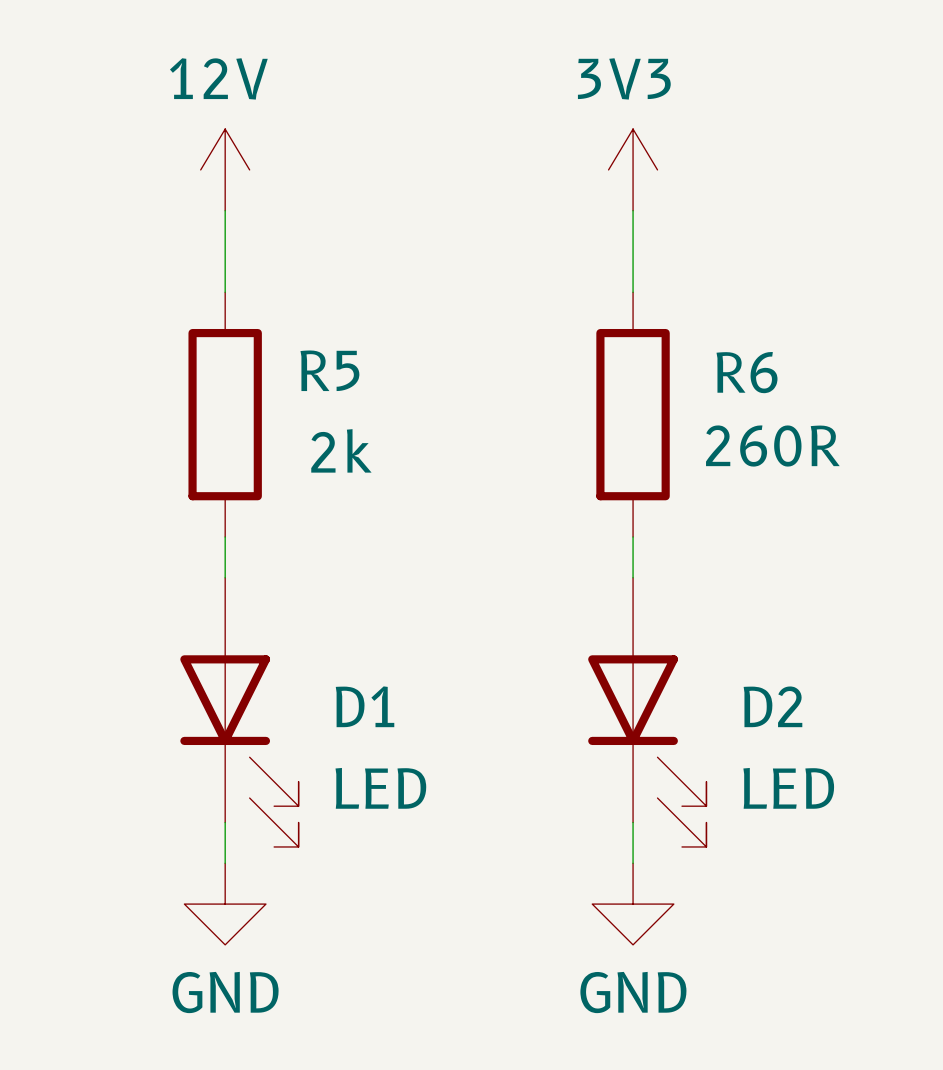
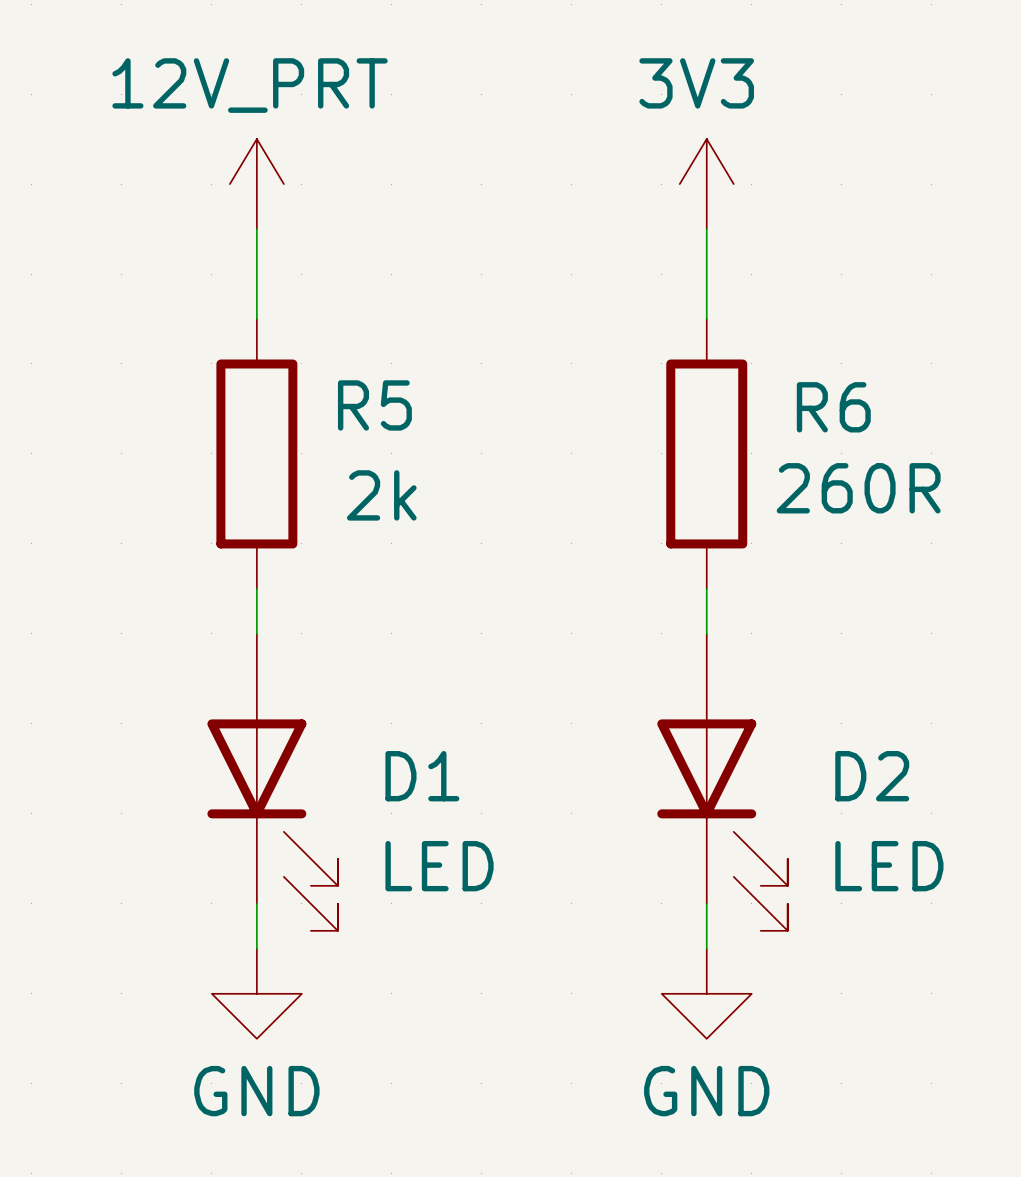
power symbol: 12V (225, 169) -> 12V_PRT (256, 184)

